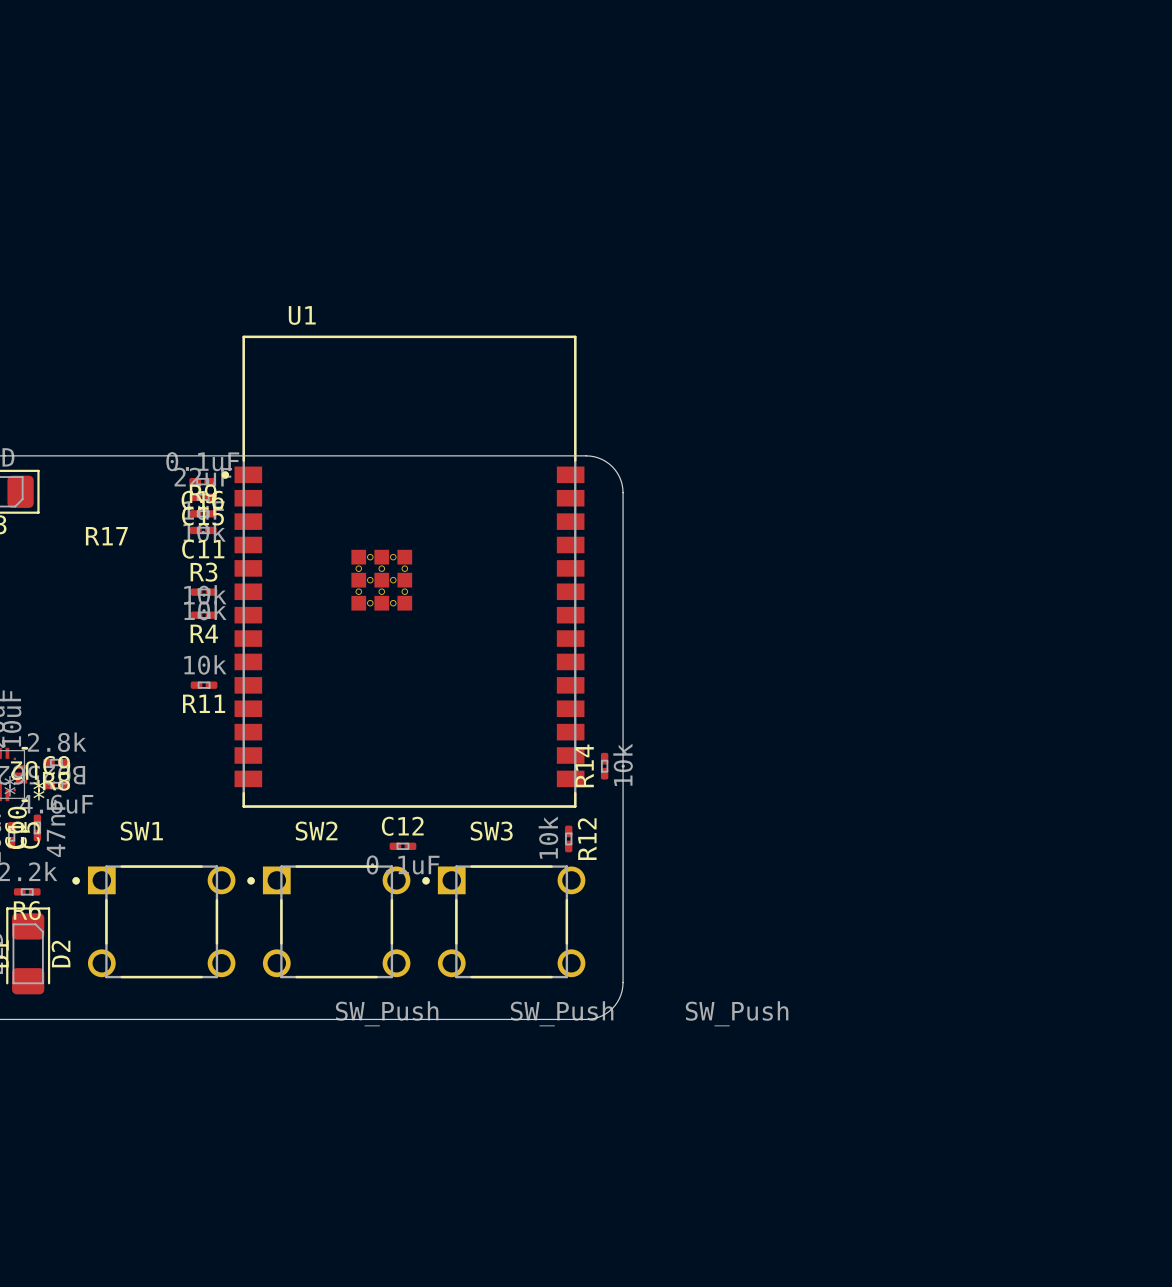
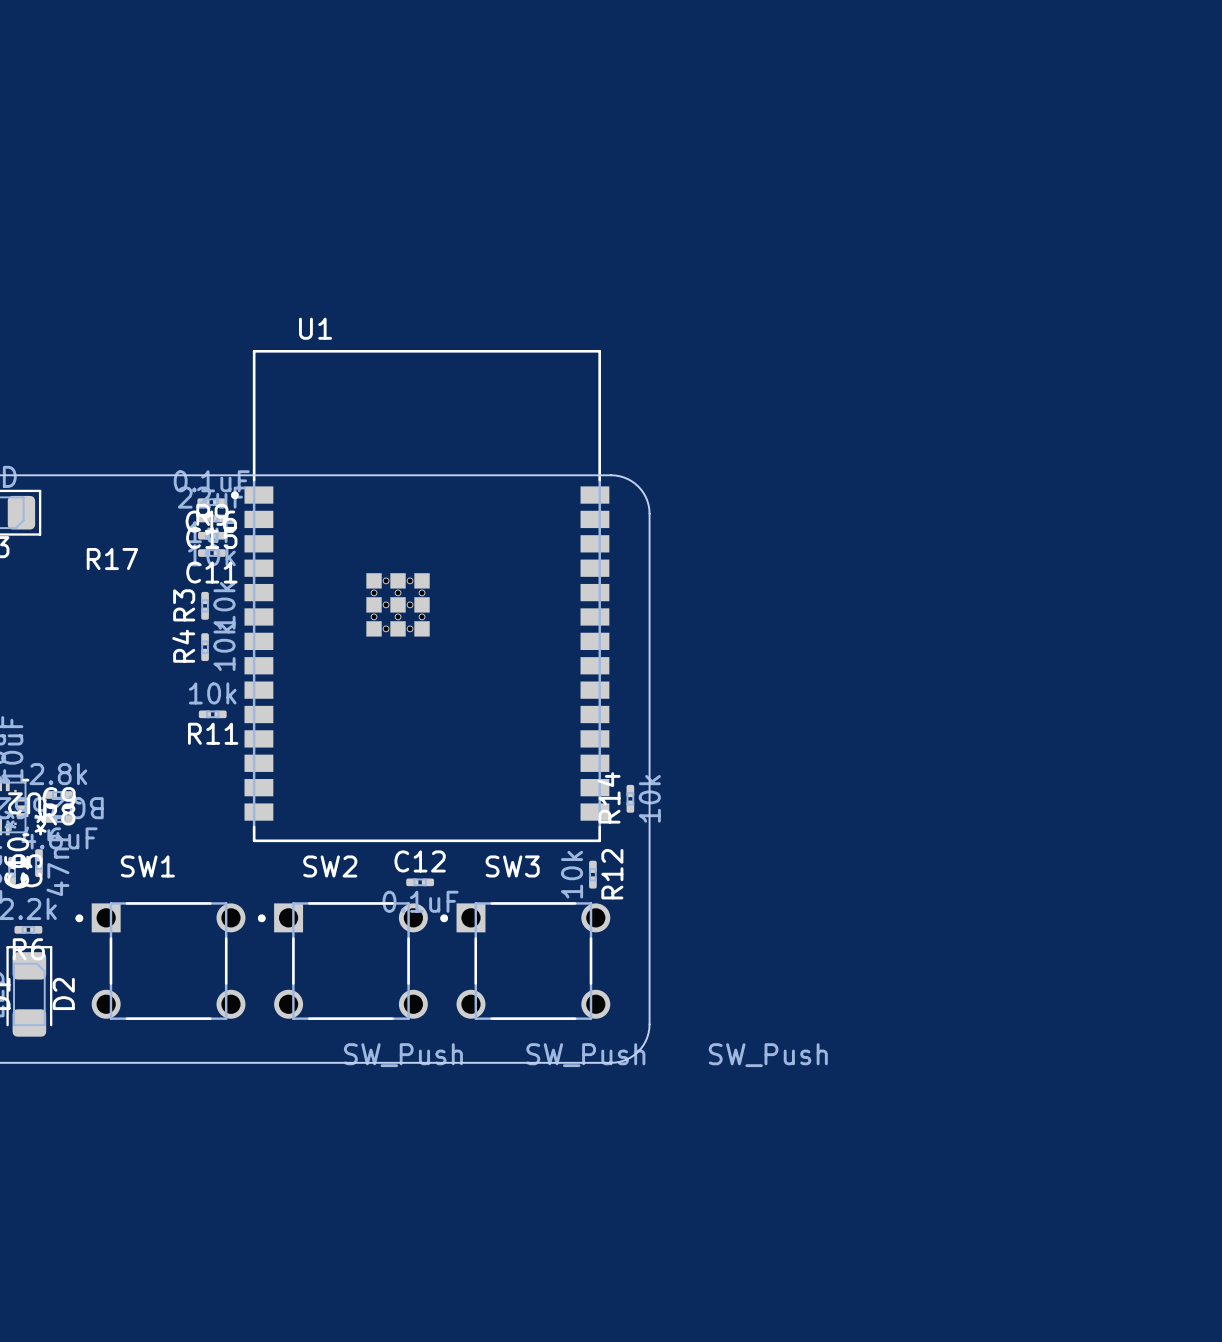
R3 rotation: 0° (204, 592) -> 90° clockwise (205, 605)
R4 rotation: 0° (204, 615) -> 90° clockwise (205, 647)

